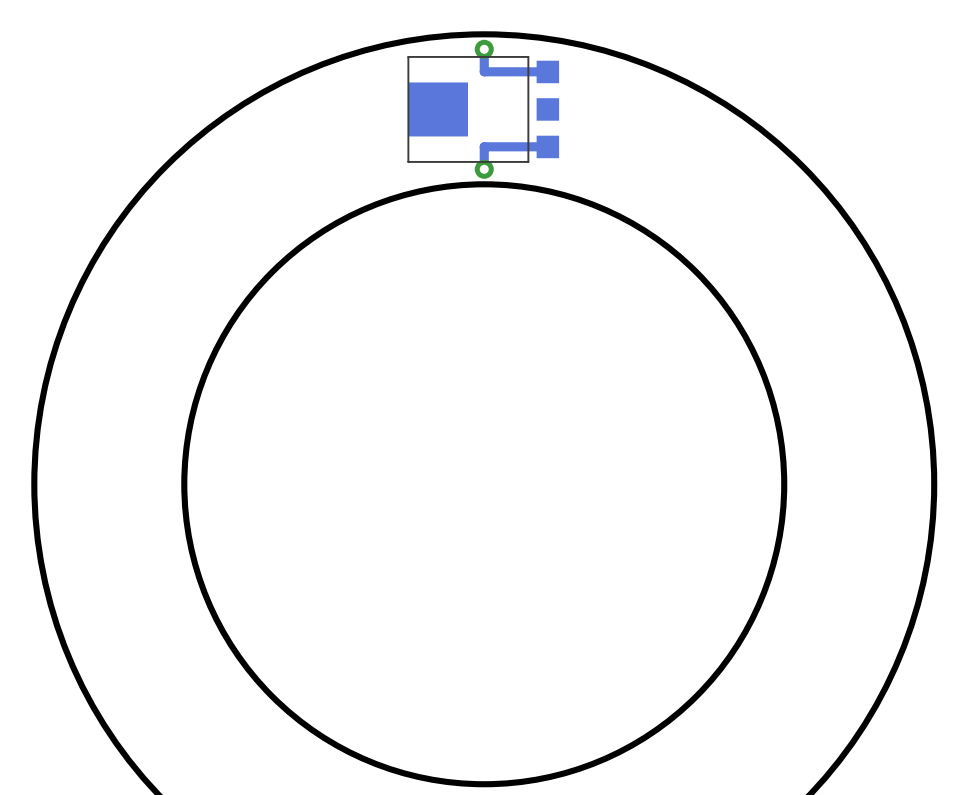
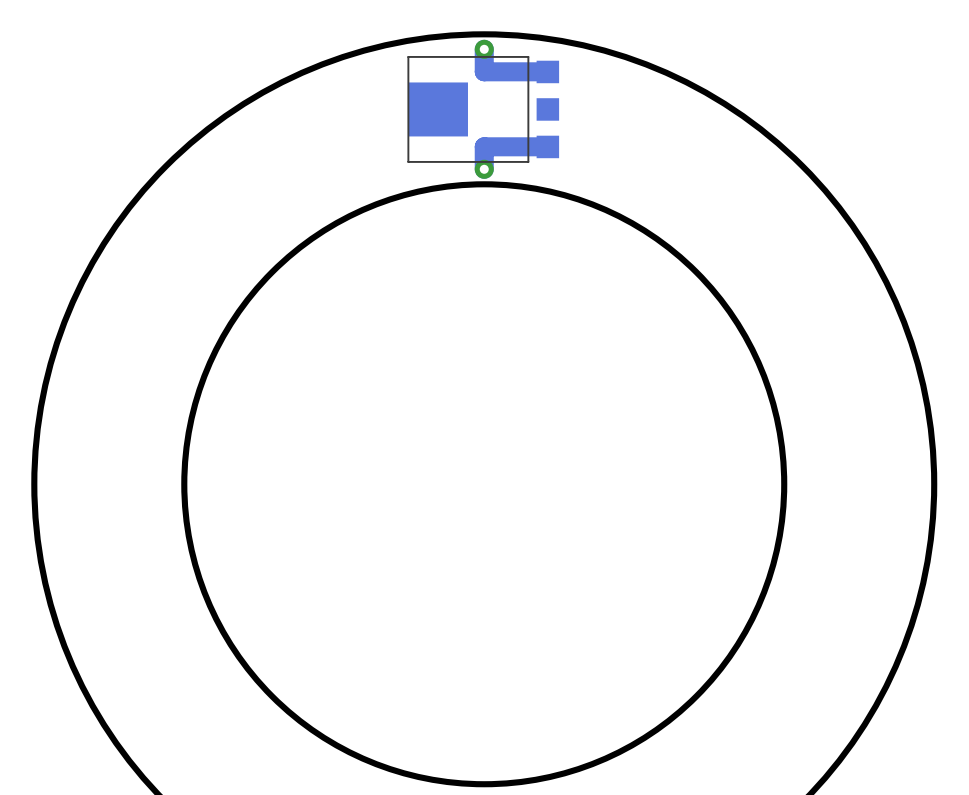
track width: thin (484, 49) (484, 71) (547, 71) -> thick (484, 49) (484, 71) (547, 71)
track width: thin (547, 146) (484, 146) (484, 169) -> thick (547, 146) (484, 146) (484, 169)

